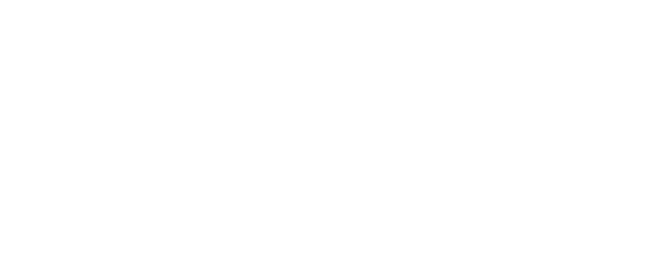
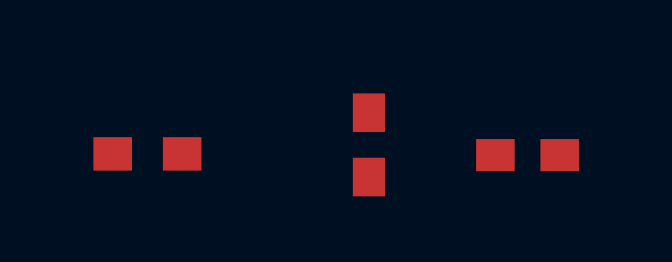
part: none -> (368, 144)
part: none -> (147, 153)
part: none -> (527, 155)

